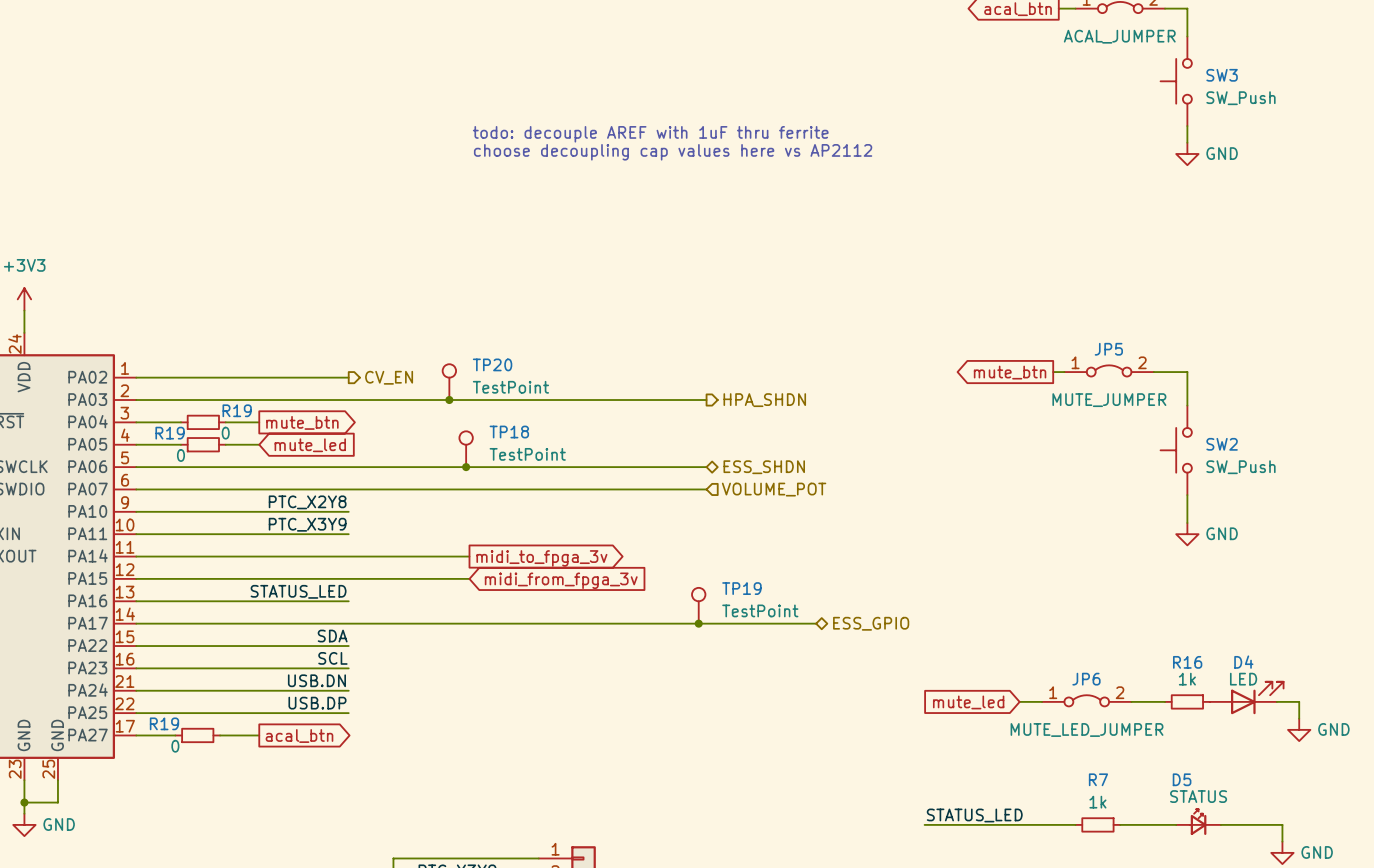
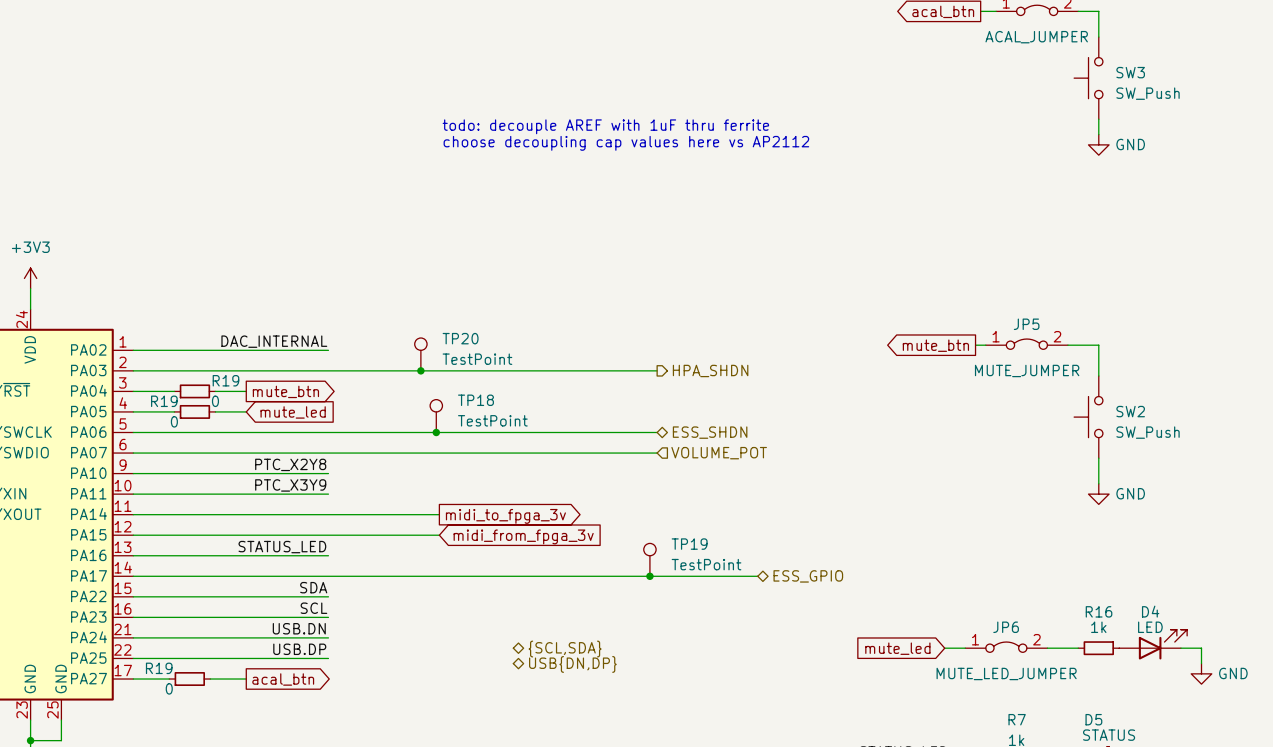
label: none -> DAC_INTERNAL (274, 341)
hierarchical label: CV_EN (389, 377) -> none
hierarchical label: none -> {SCL,SDA} (565, 649)
hierarchical label: none -> USB{DN,DP} (572, 664)

